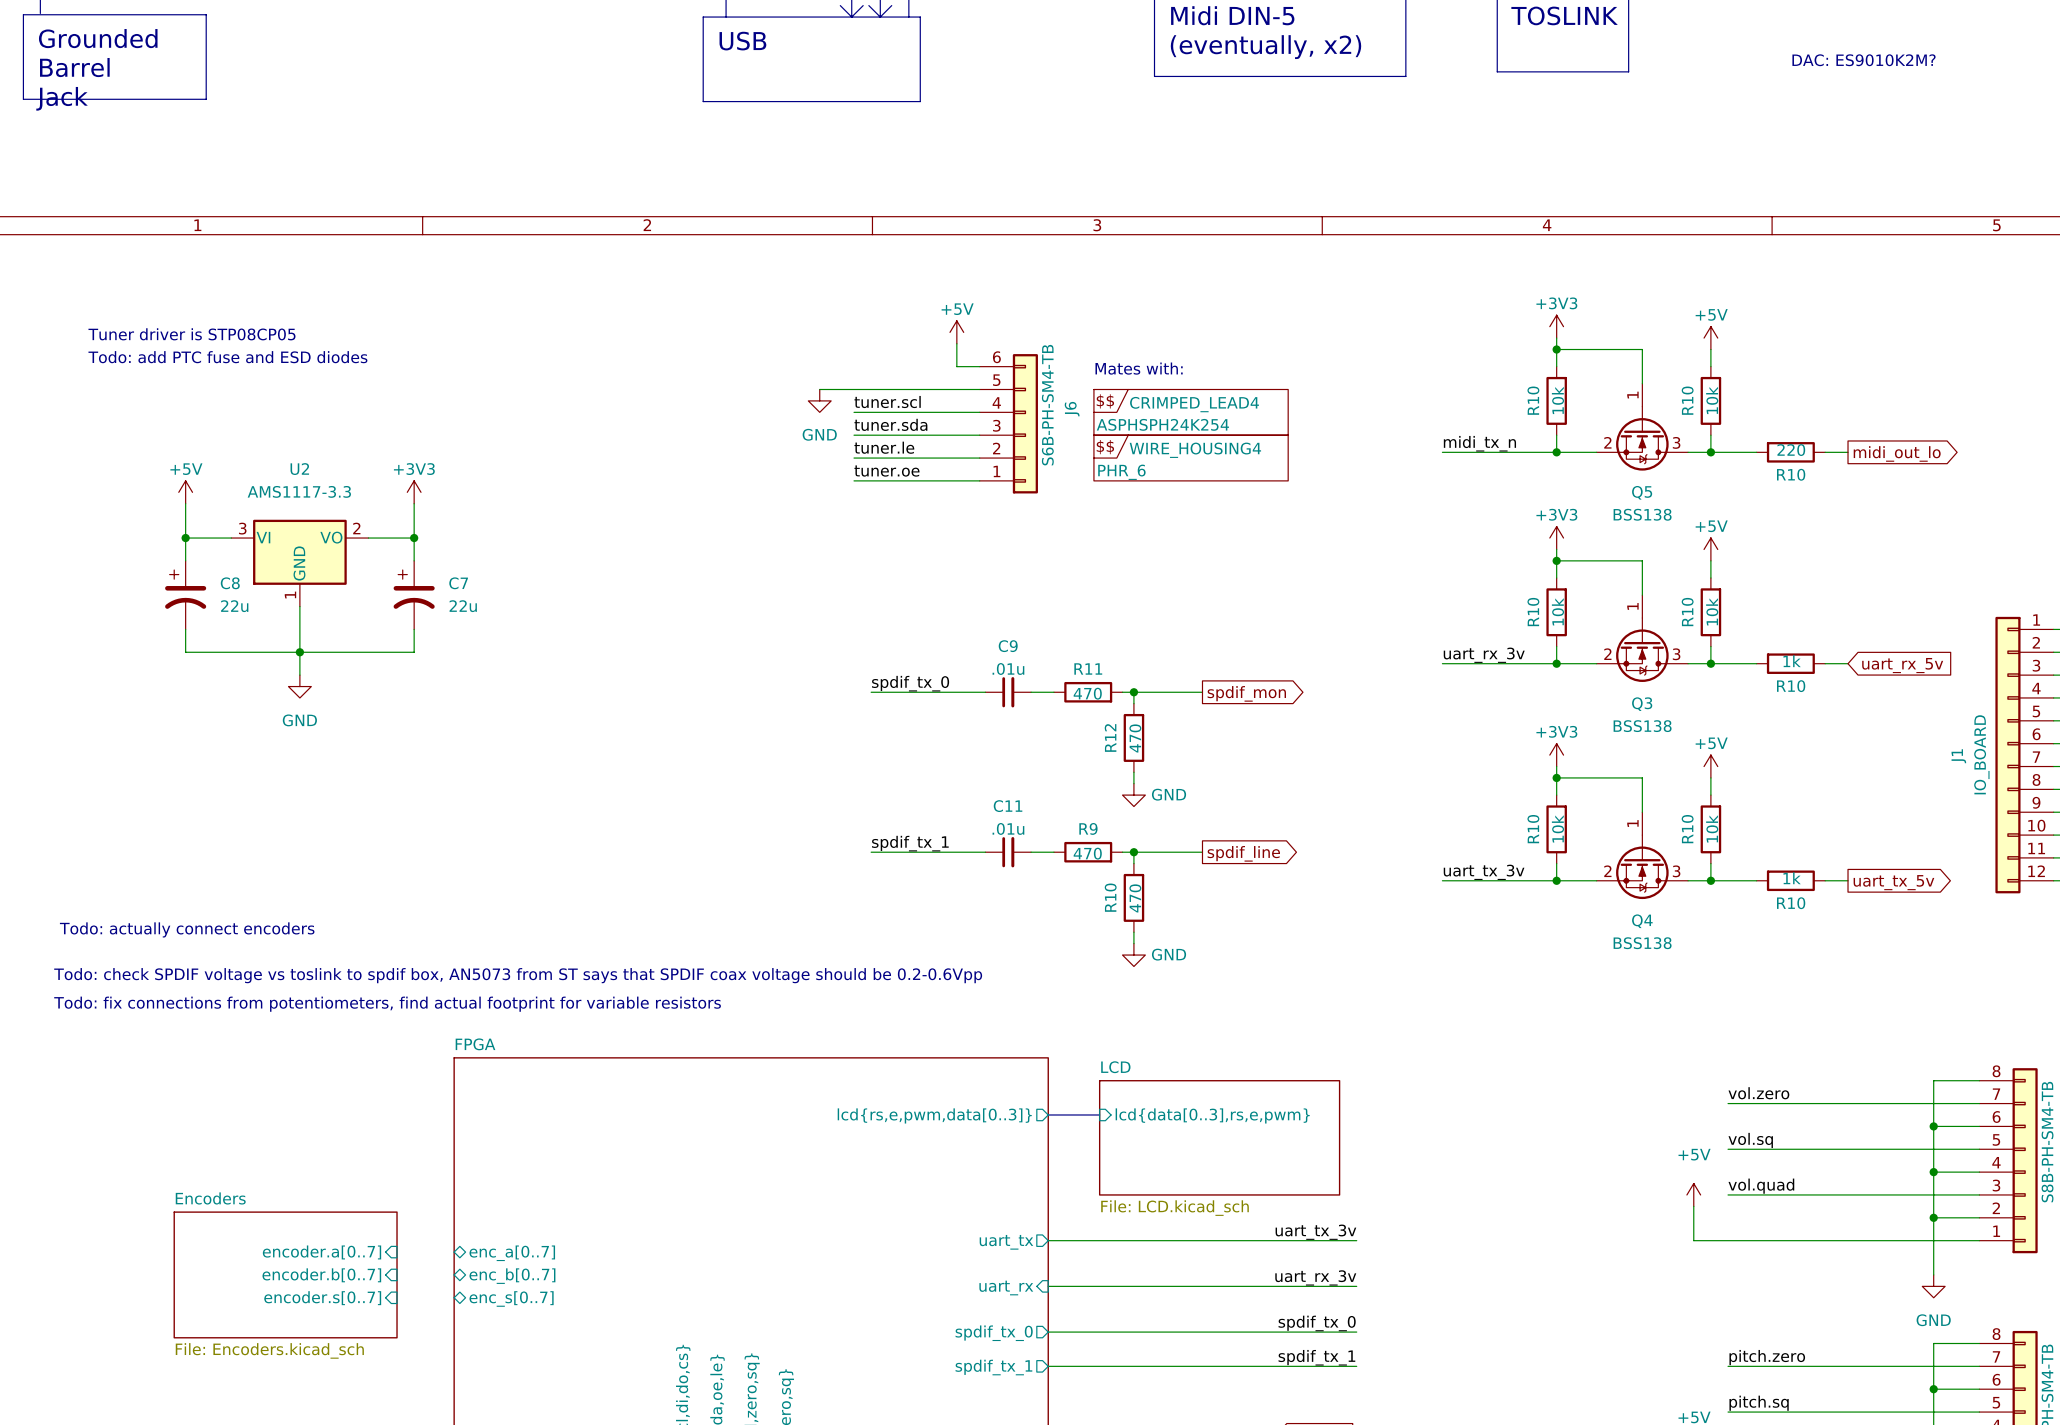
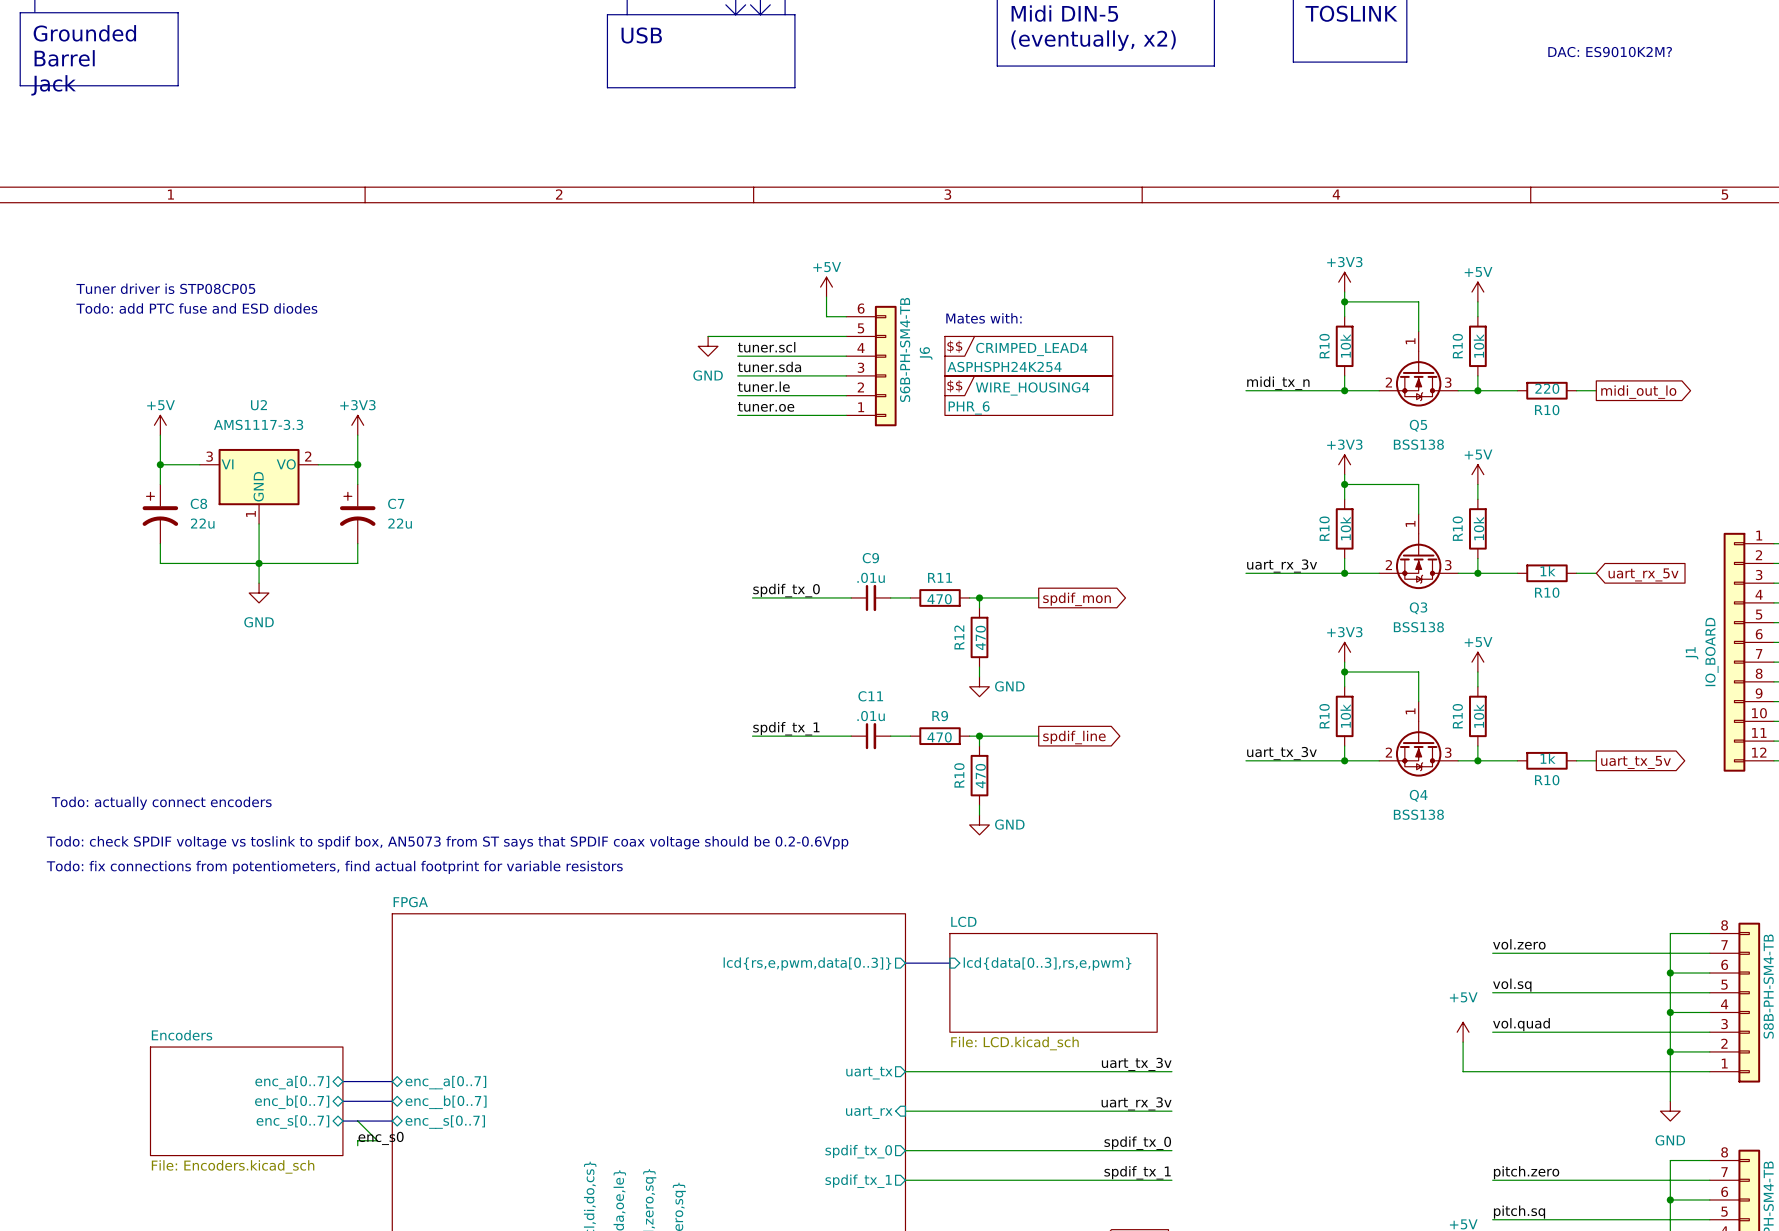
sheet pin shape: input (322, 1252) -> bidirectional (292, 1082)
sheet pin: encoder.a[0..7] (322, 1252) -> enc_a[0..7] (292, 1082)
bus: none -> (342, 1081) (392, 1081)
sheet pin: enc_a[0..7] (512, 1253) -> enc__a[0..7] (445, 1082)
bus: none -> (342, 1101) (392, 1101)
sheet pin shape: input (321, 1275) -> bidirectional (292, 1102)
sheet pin: encoder.b[0..7] (321, 1275) -> enc_b[0..7] (292, 1102)
sheet pin: enc_b[0..7] (512, 1276) -> enc__b[0..7] (446, 1102)
bus: none -> (342, 1121) (392, 1121)
wire: none -> (357, 1121) (377, 1140) (357, 1140) (357, 1145)
sheet pin shape: input (322, 1298) -> bidirectional (292, 1122)
sheet pin: encoder.s[0..7] (322, 1298) -> enc_s[0..7] (292, 1122)
sheet pin: enc_s[0..7] (511, 1298) -> enc__s[0..7] (445, 1122)
label: none -> enc_s0 (381, 1138)

